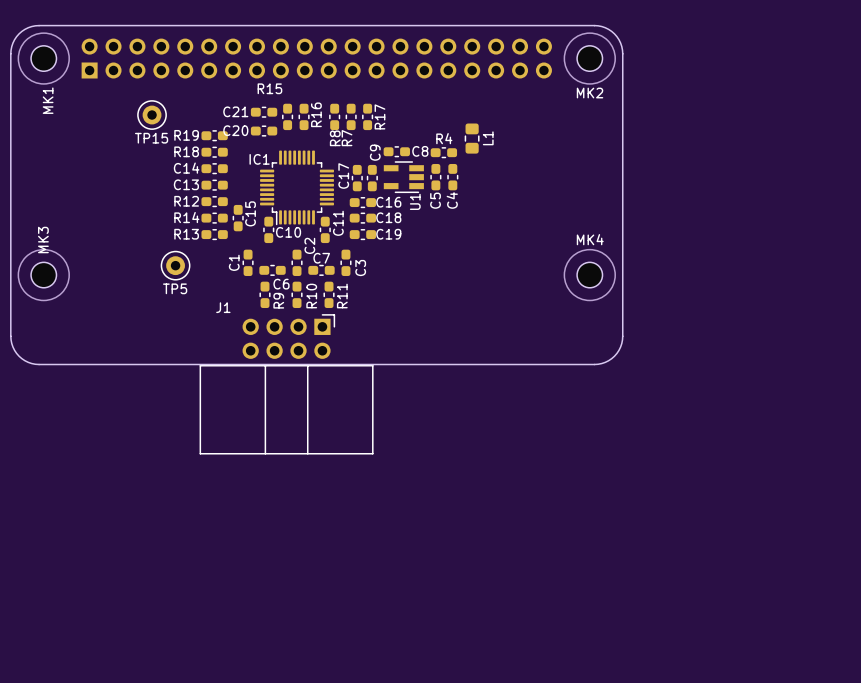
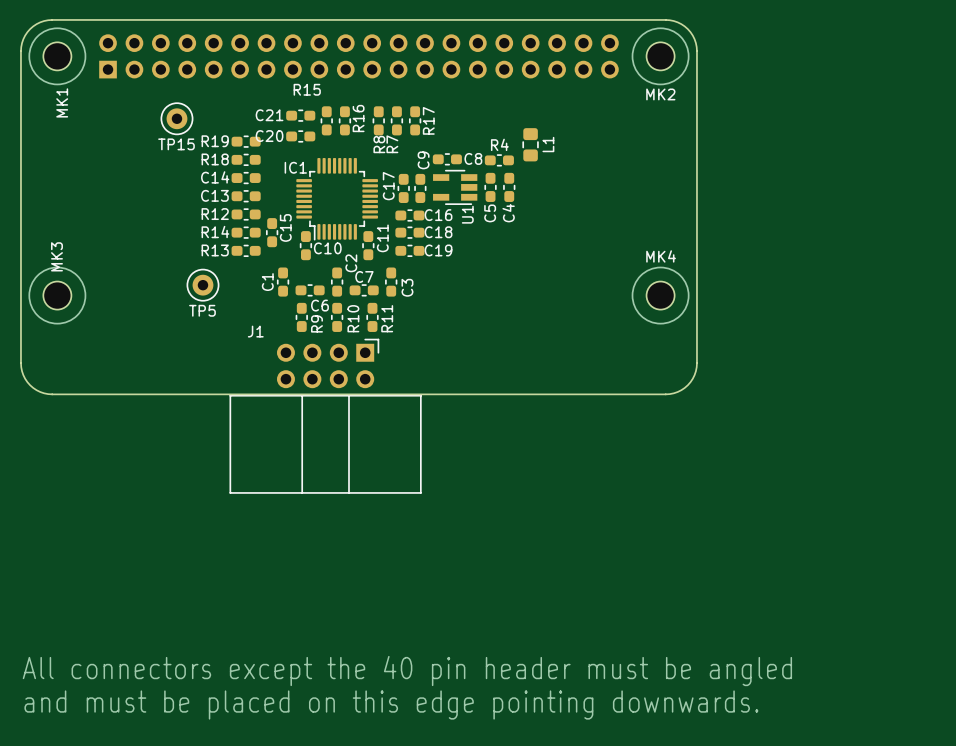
text: none -> All connectors except the 40 pin header must be angled (407, 671)
text: none -> and must be placed on this edge pointing downwards. (391, 705)

